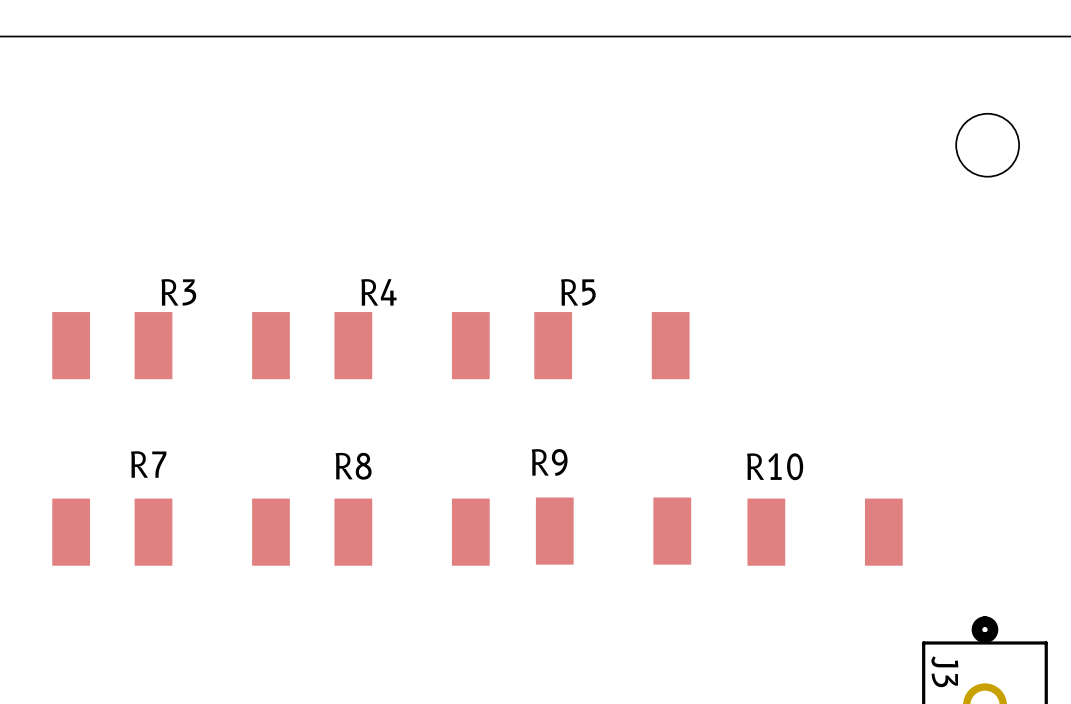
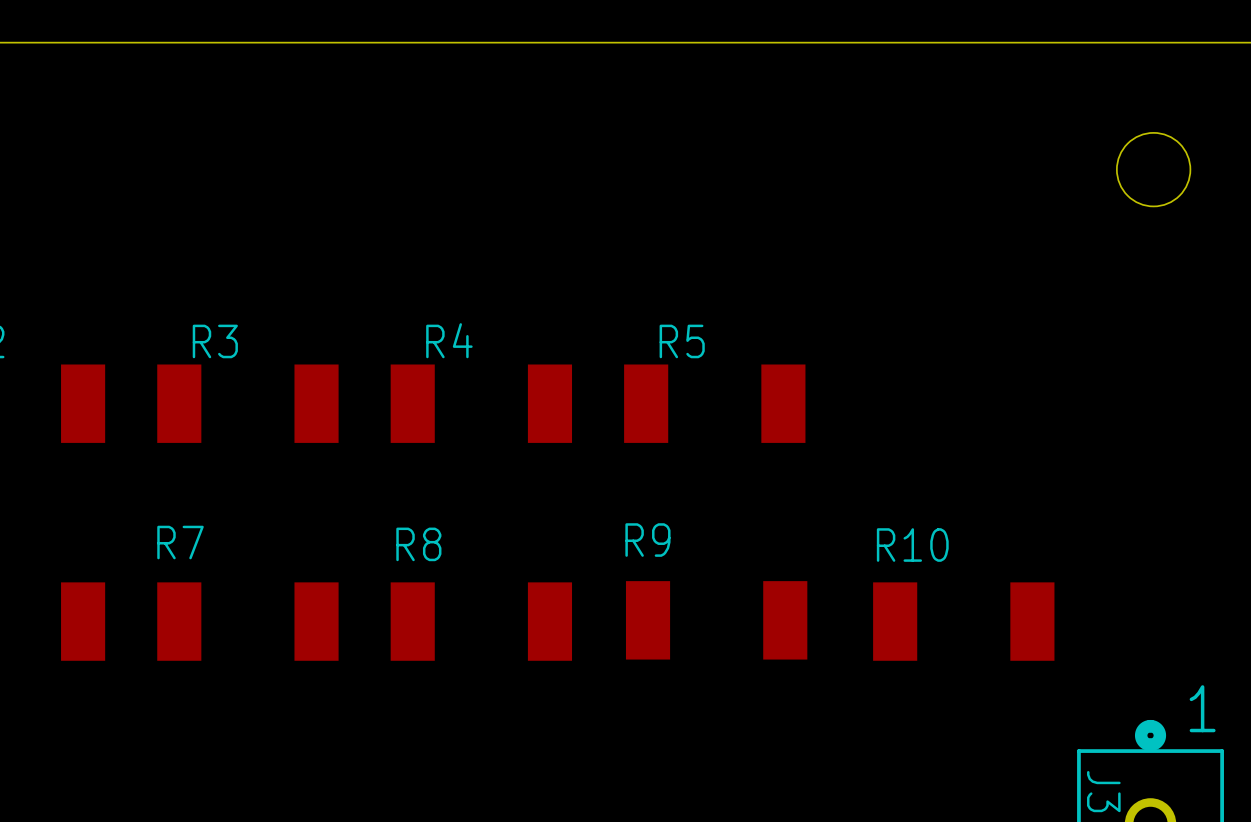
text: none -> 1 (1202, 708)

